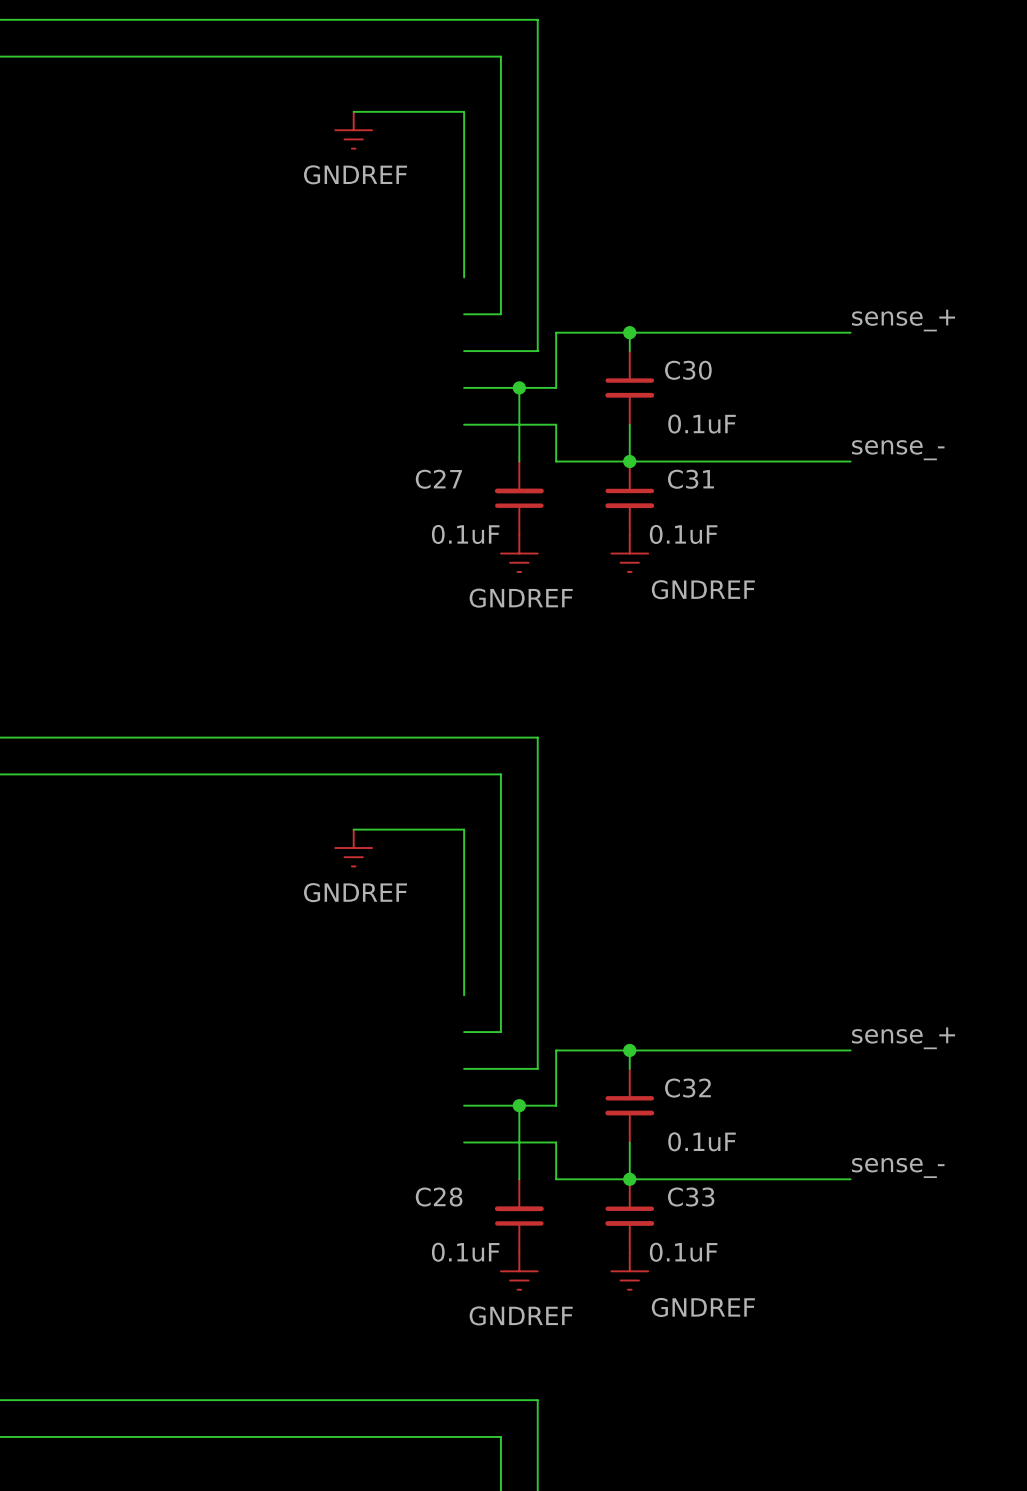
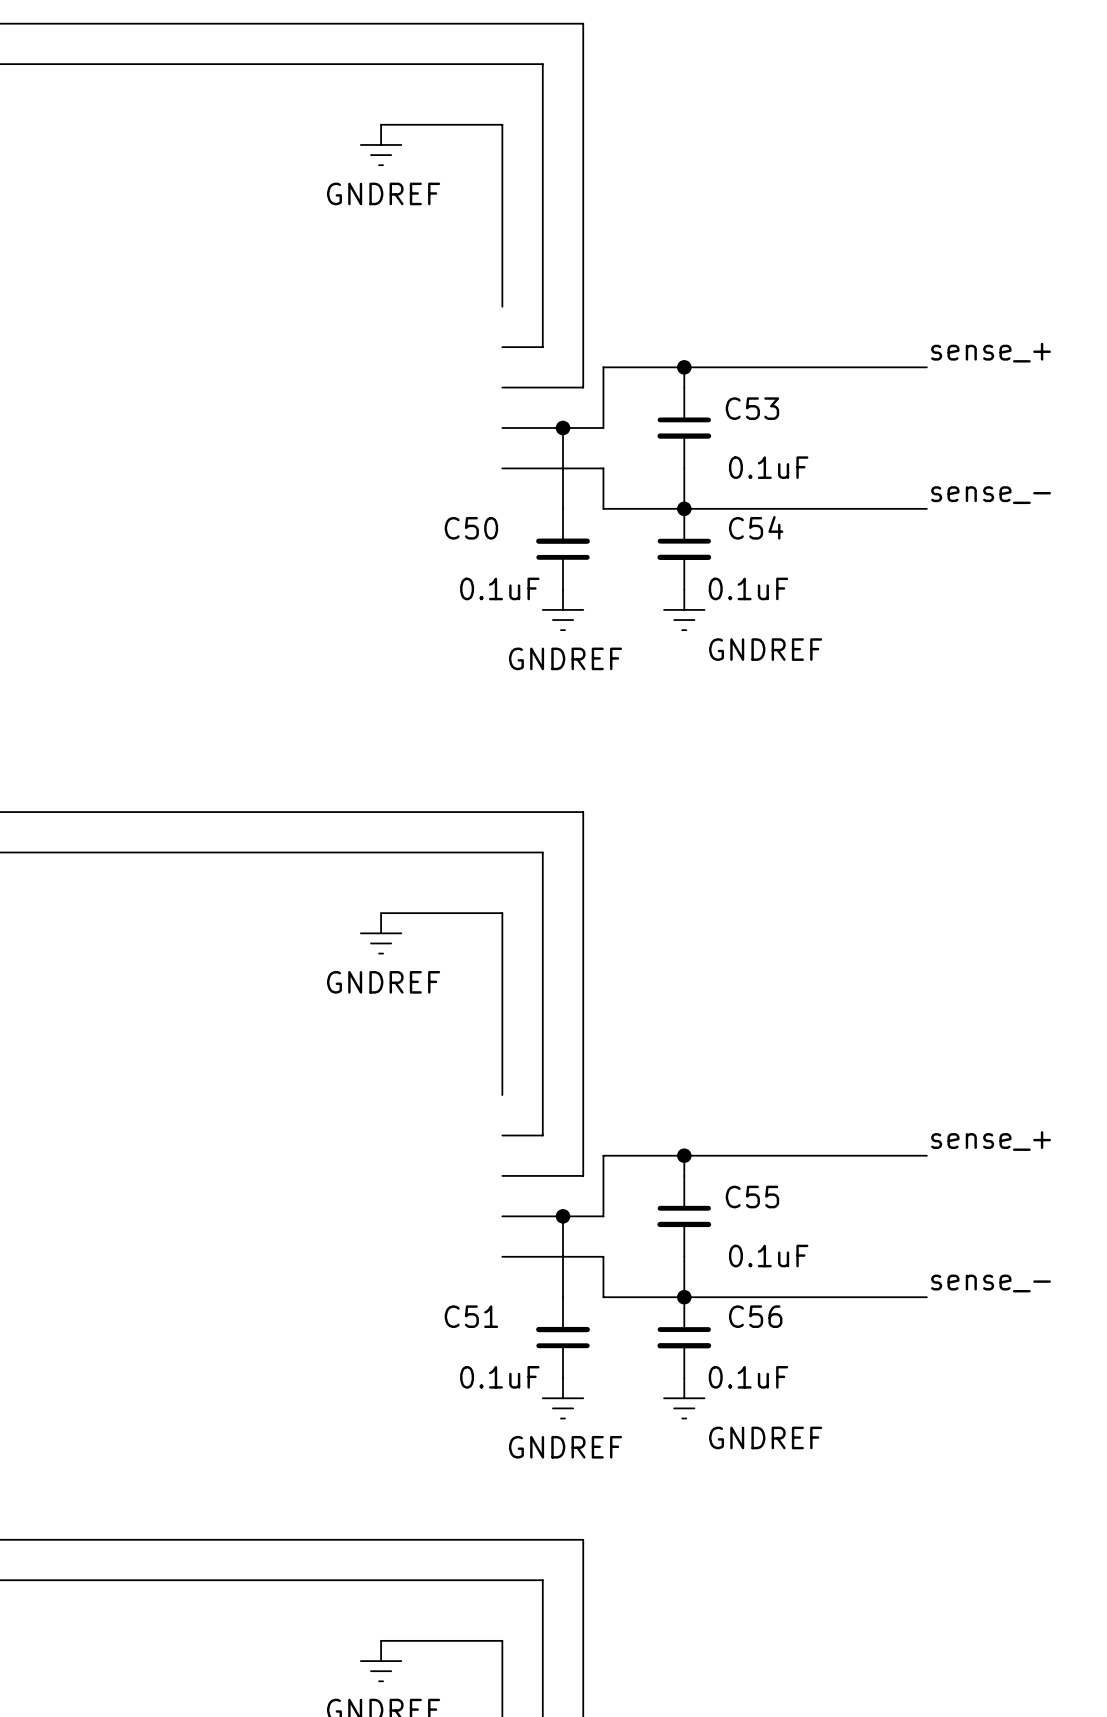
C30 name: C30 (688, 370) -> C53 (752, 408)
C27 name: C27 (438, 479) -> C50 (471, 528)
C31 name: C31 (690, 479) -> C54 (756, 527)
C32 name: C32 (687, 1088) -> C55 (752, 1197)
C28 name: C28 (439, 1197) -> C51 (471, 1316)
C33 name: C33 (691, 1197) -> C56 (755, 1316)

